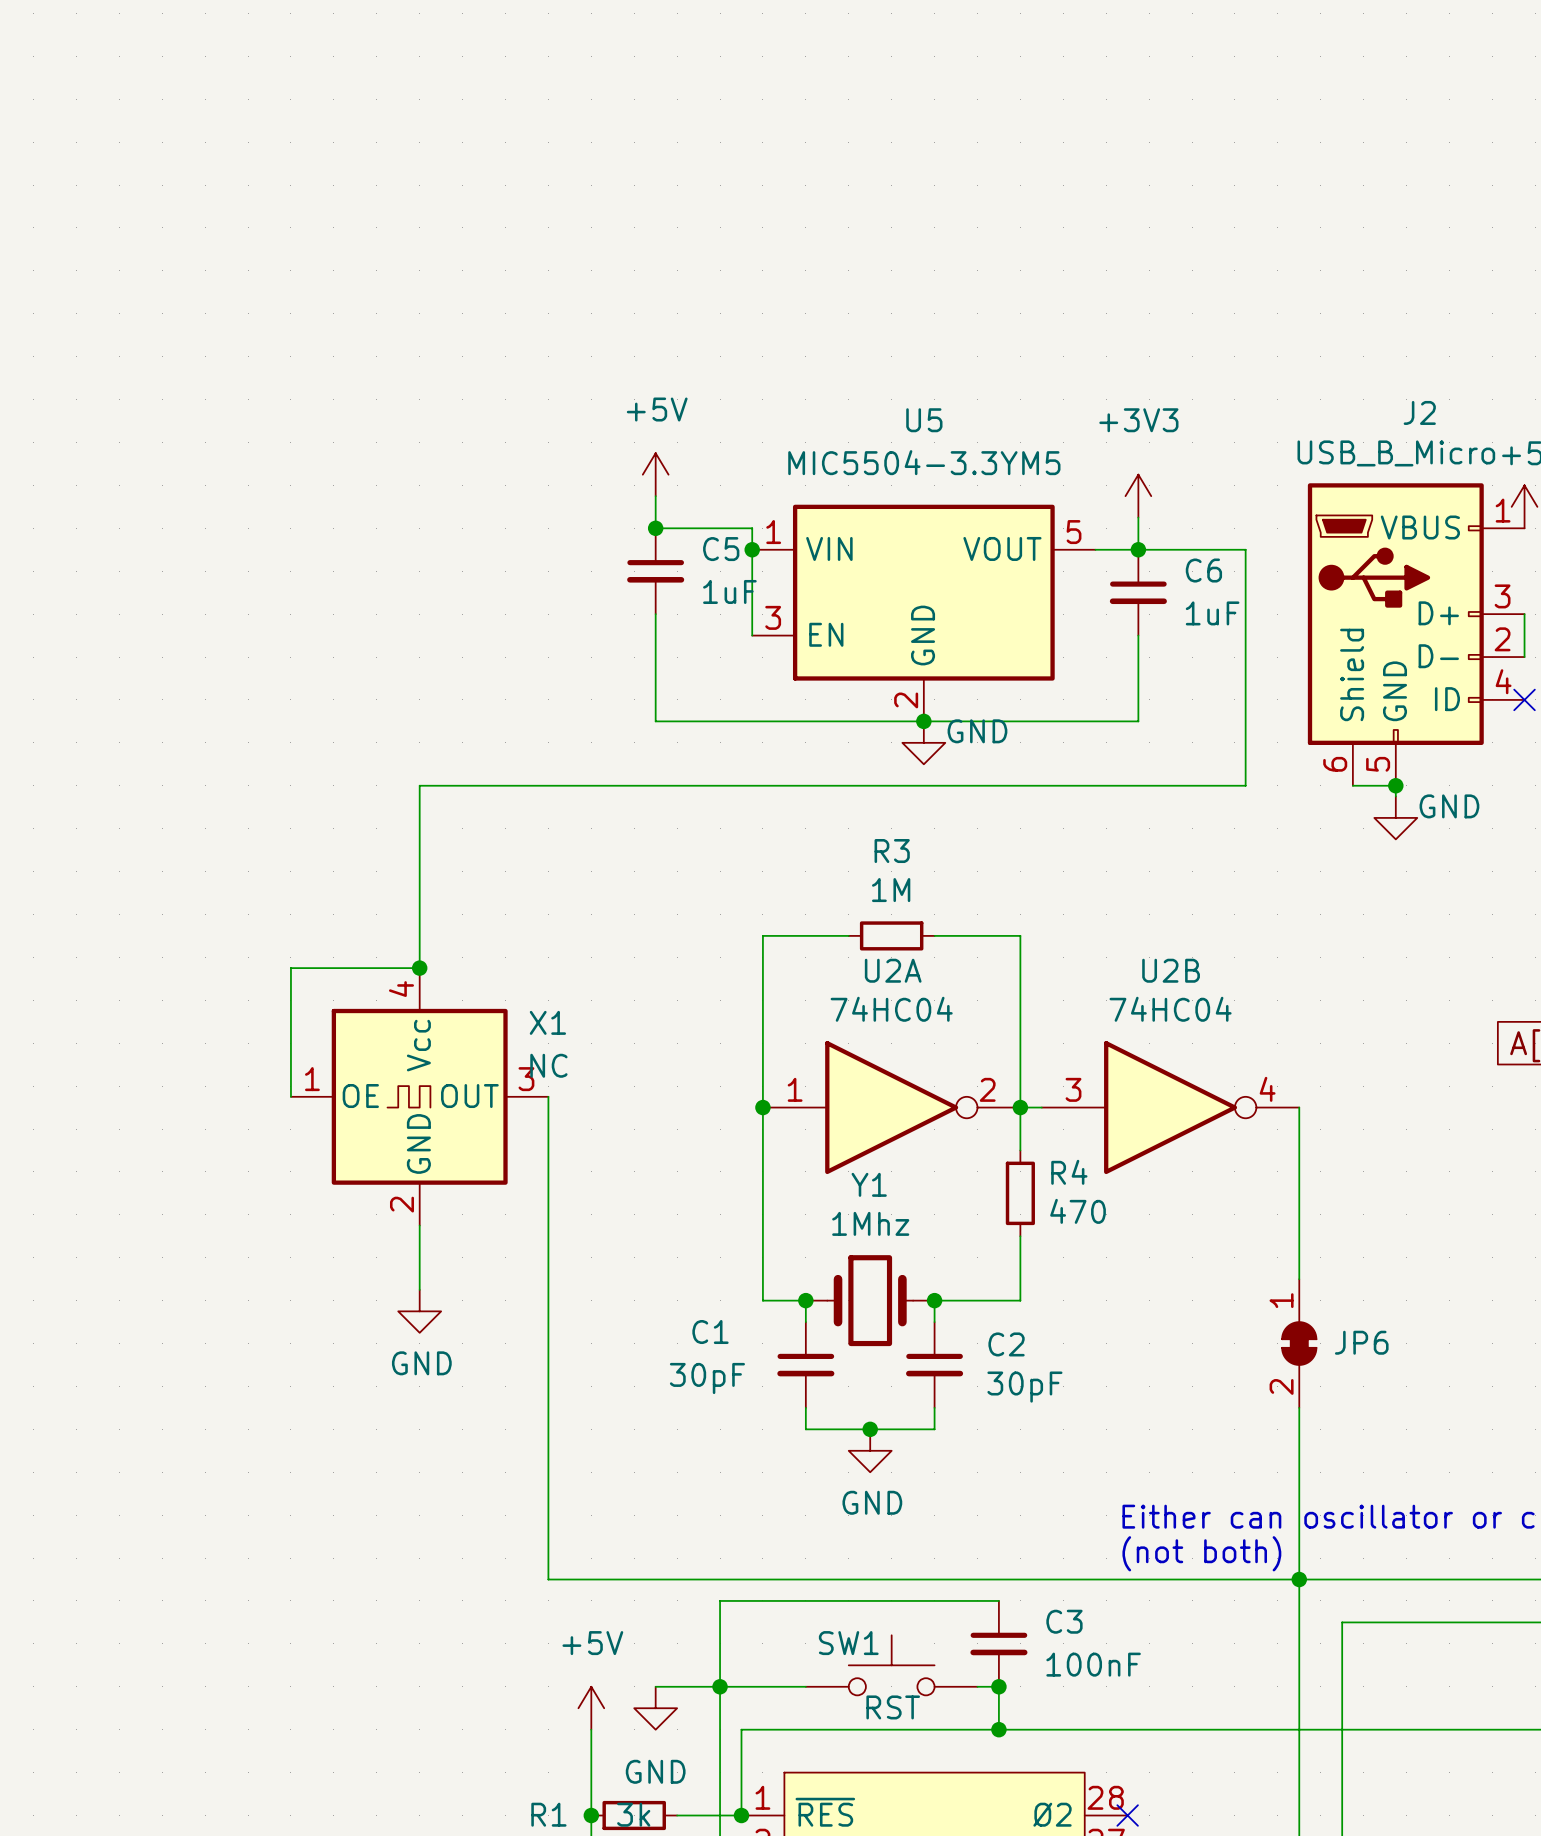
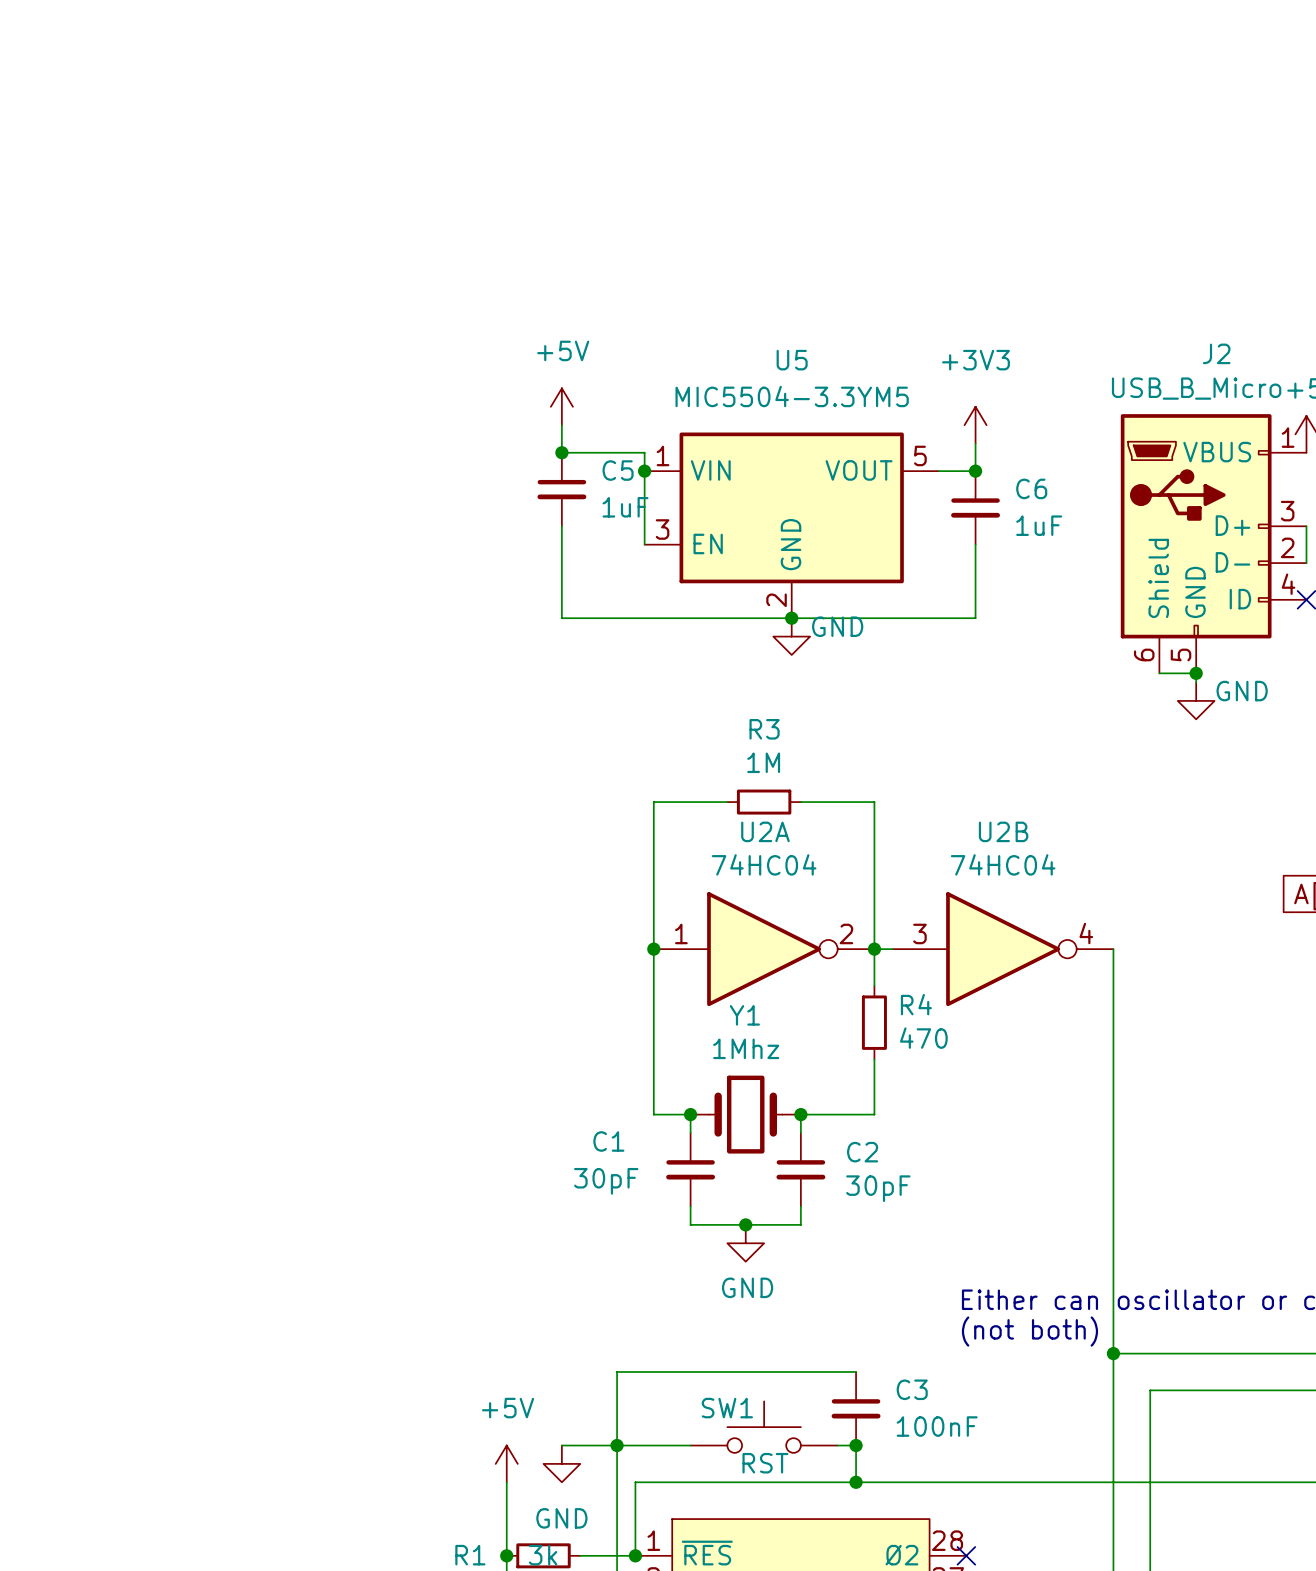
wire: (1138, 549) (1245, 549) (1245, 785) (419, 785) (419, 968) (290, 968) (290, 1096) -> none
junction: (419, 968) -> none
X1: NC (419, 1096) -> none
wire: (548, 1096) (548, 1579) (1299, 1579) -> none
wire: (419, 1225) (419, 1289) -> none
power symbol: GND (419, 1311) -> none
JP6: (1299, 1343) -> none

